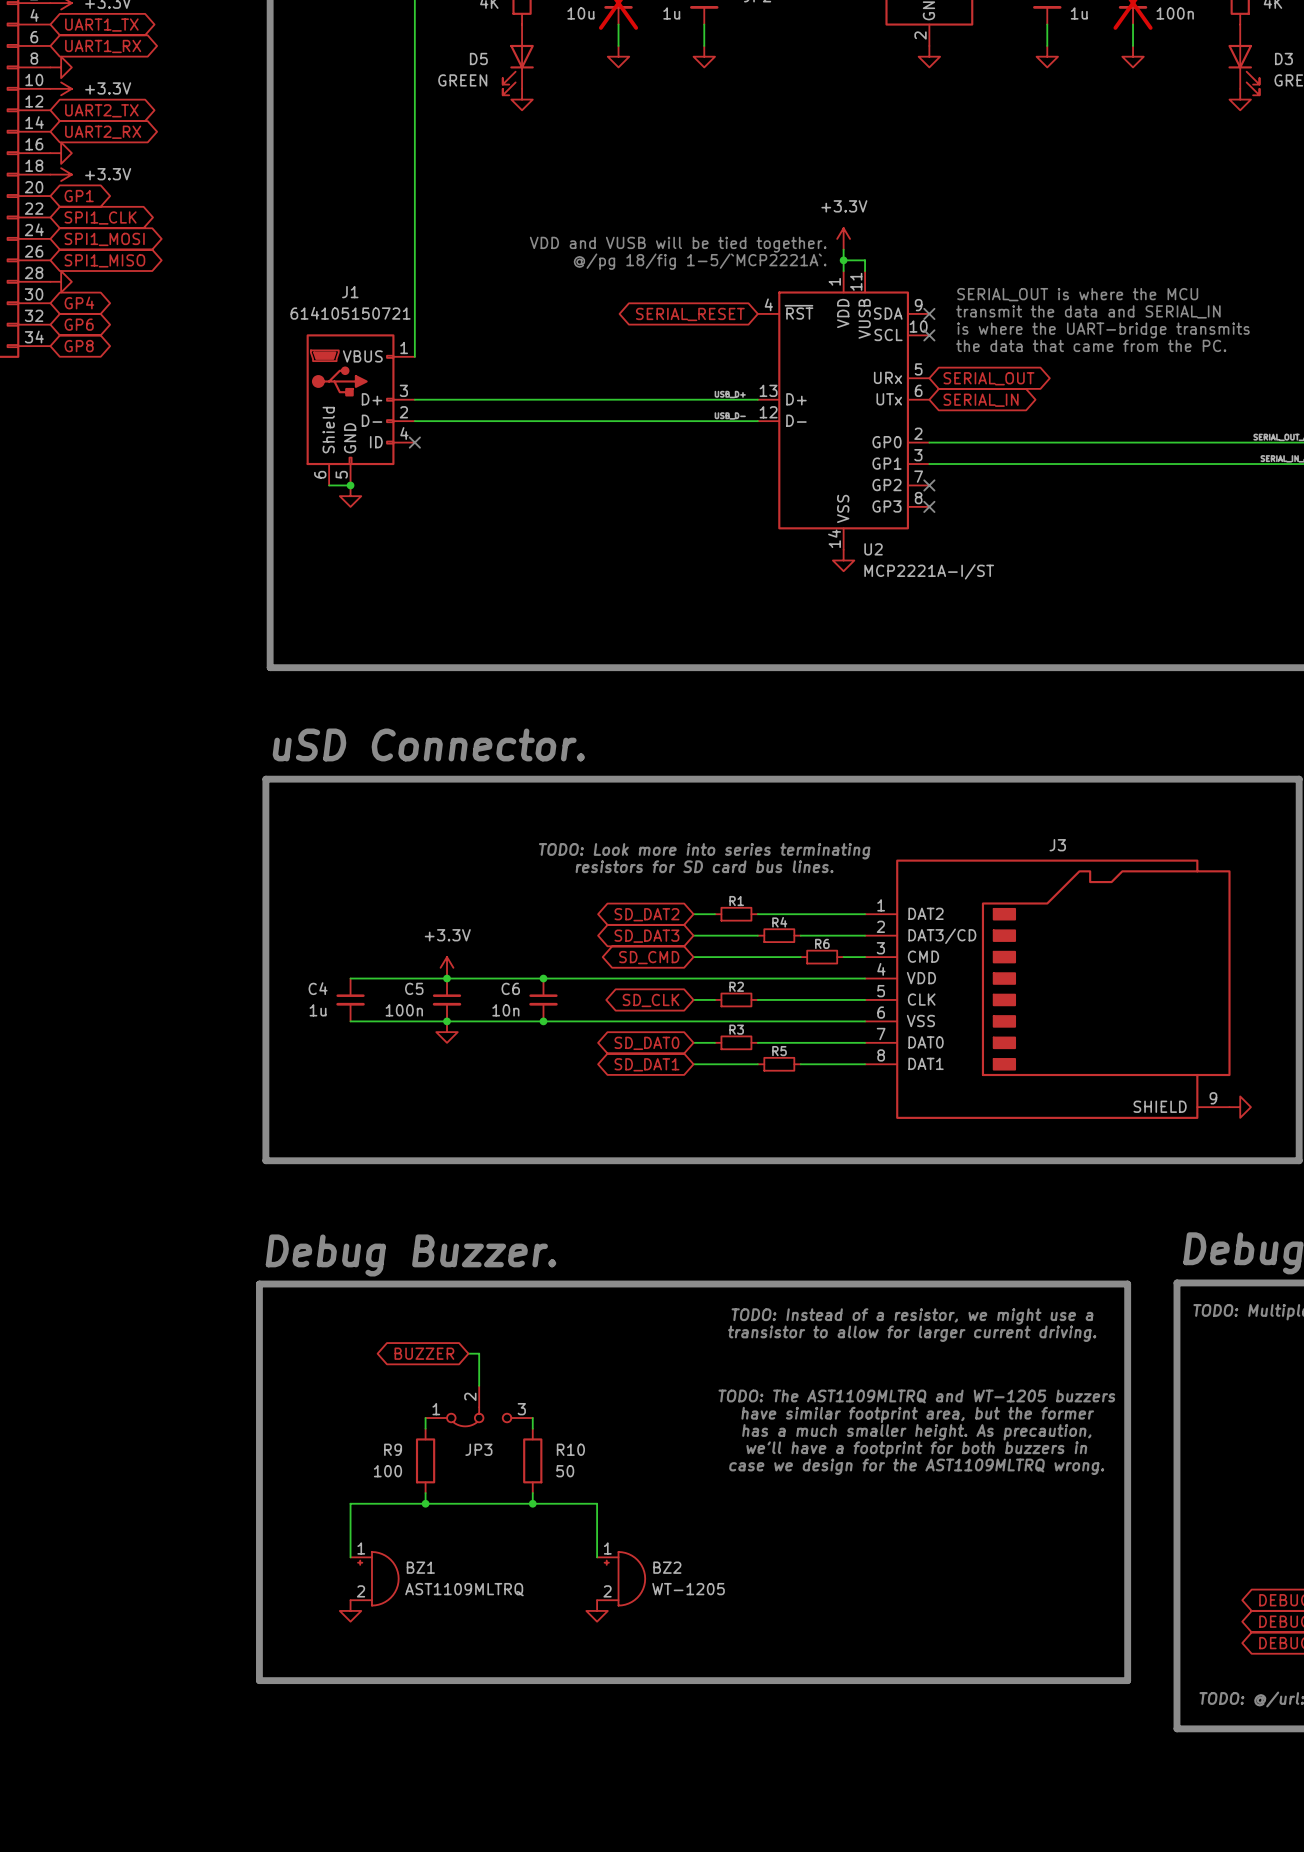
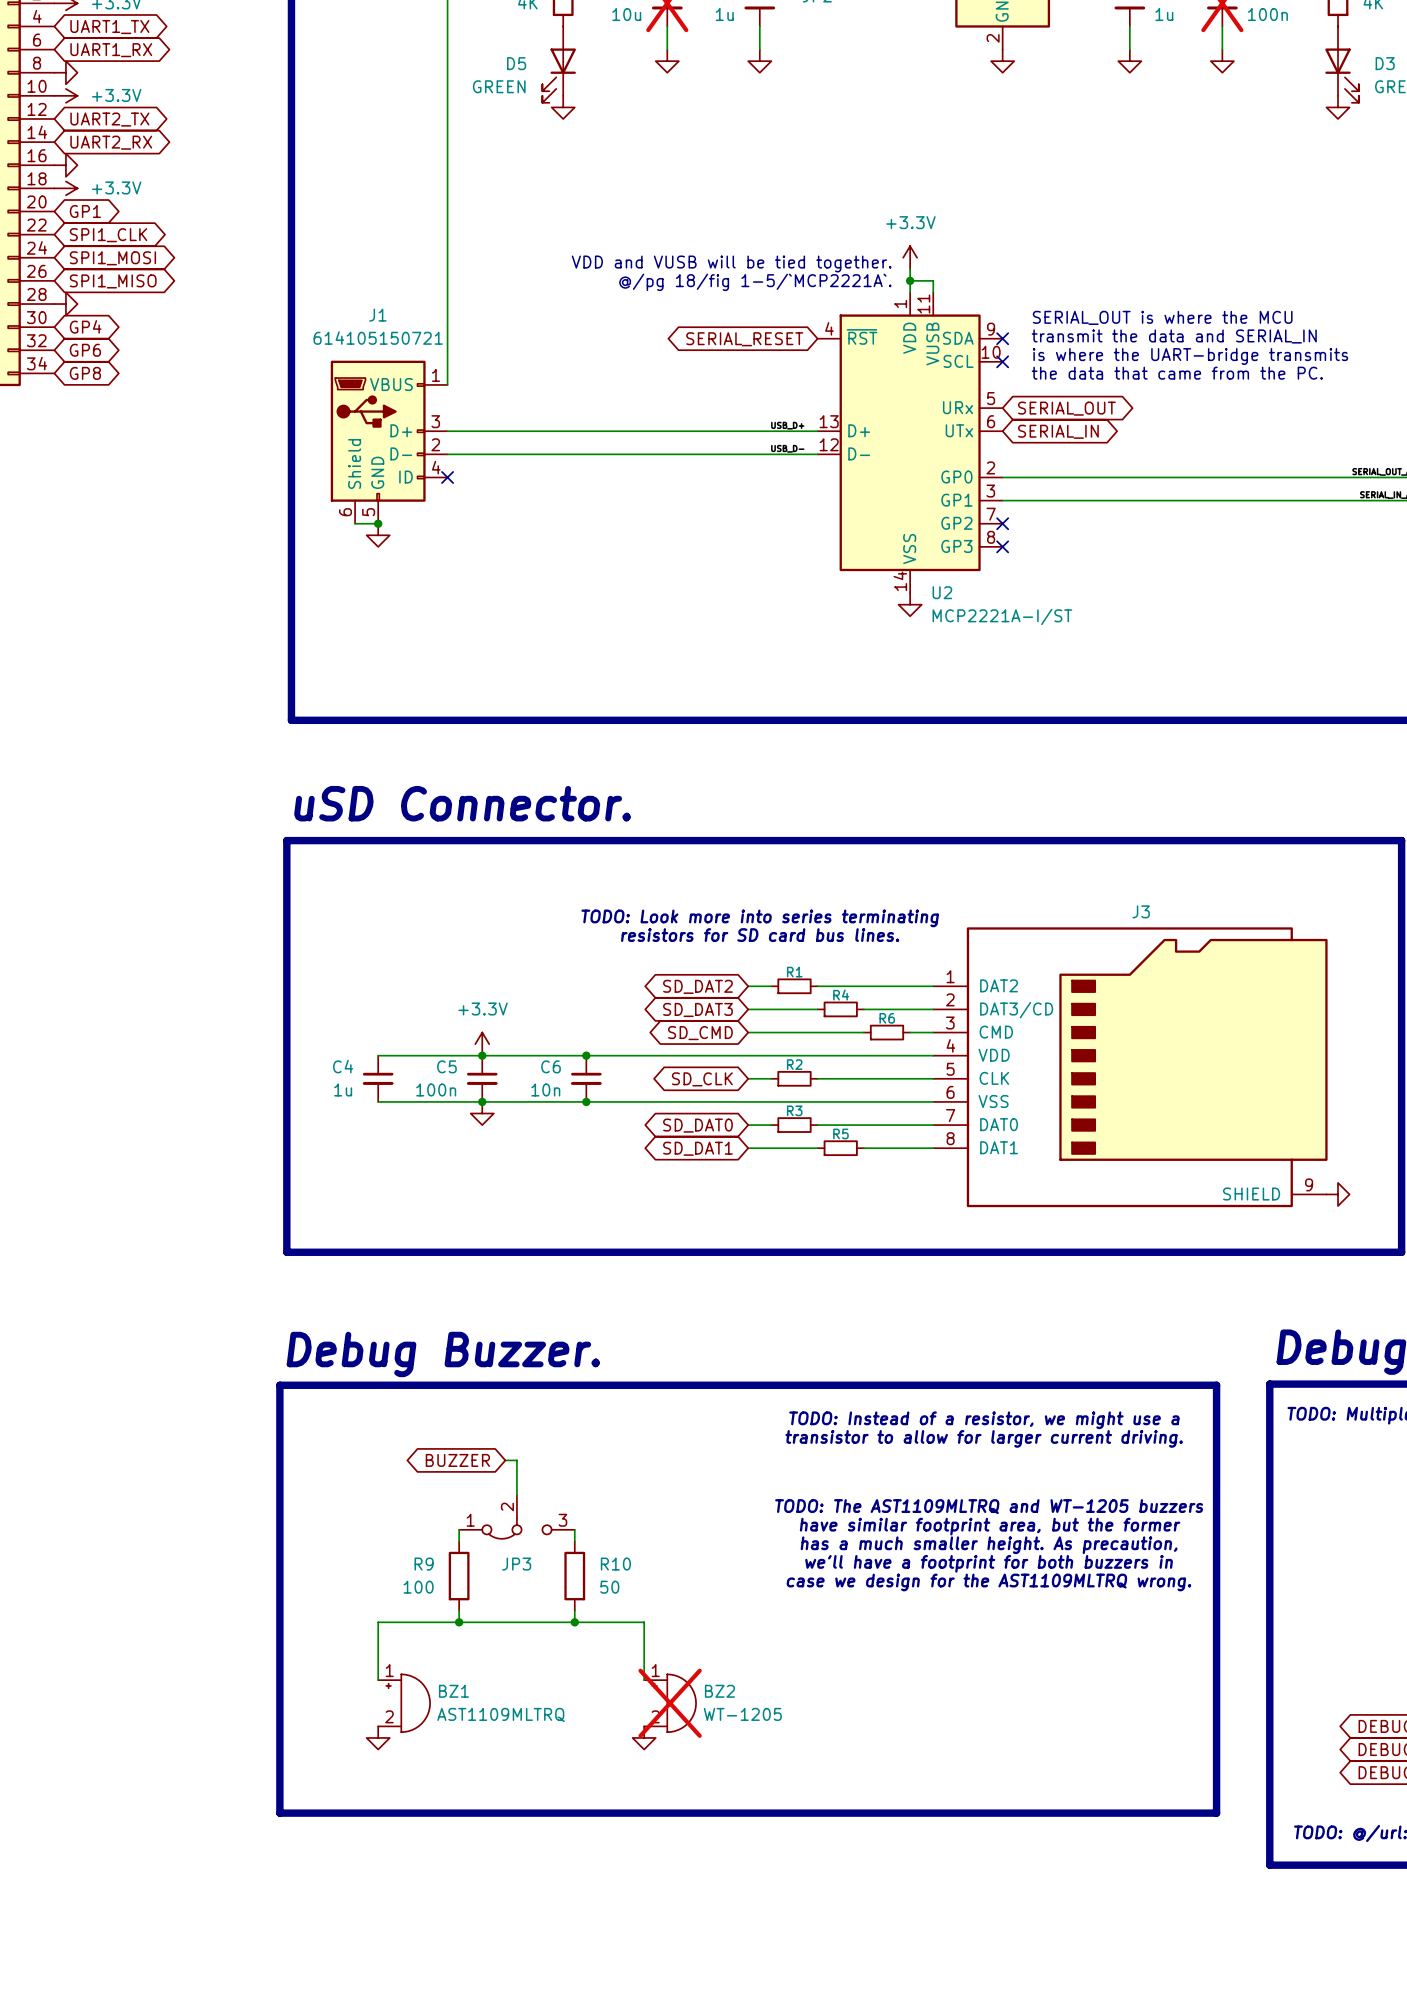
BZ2 do-not-place cross: none -> (670, 1703)

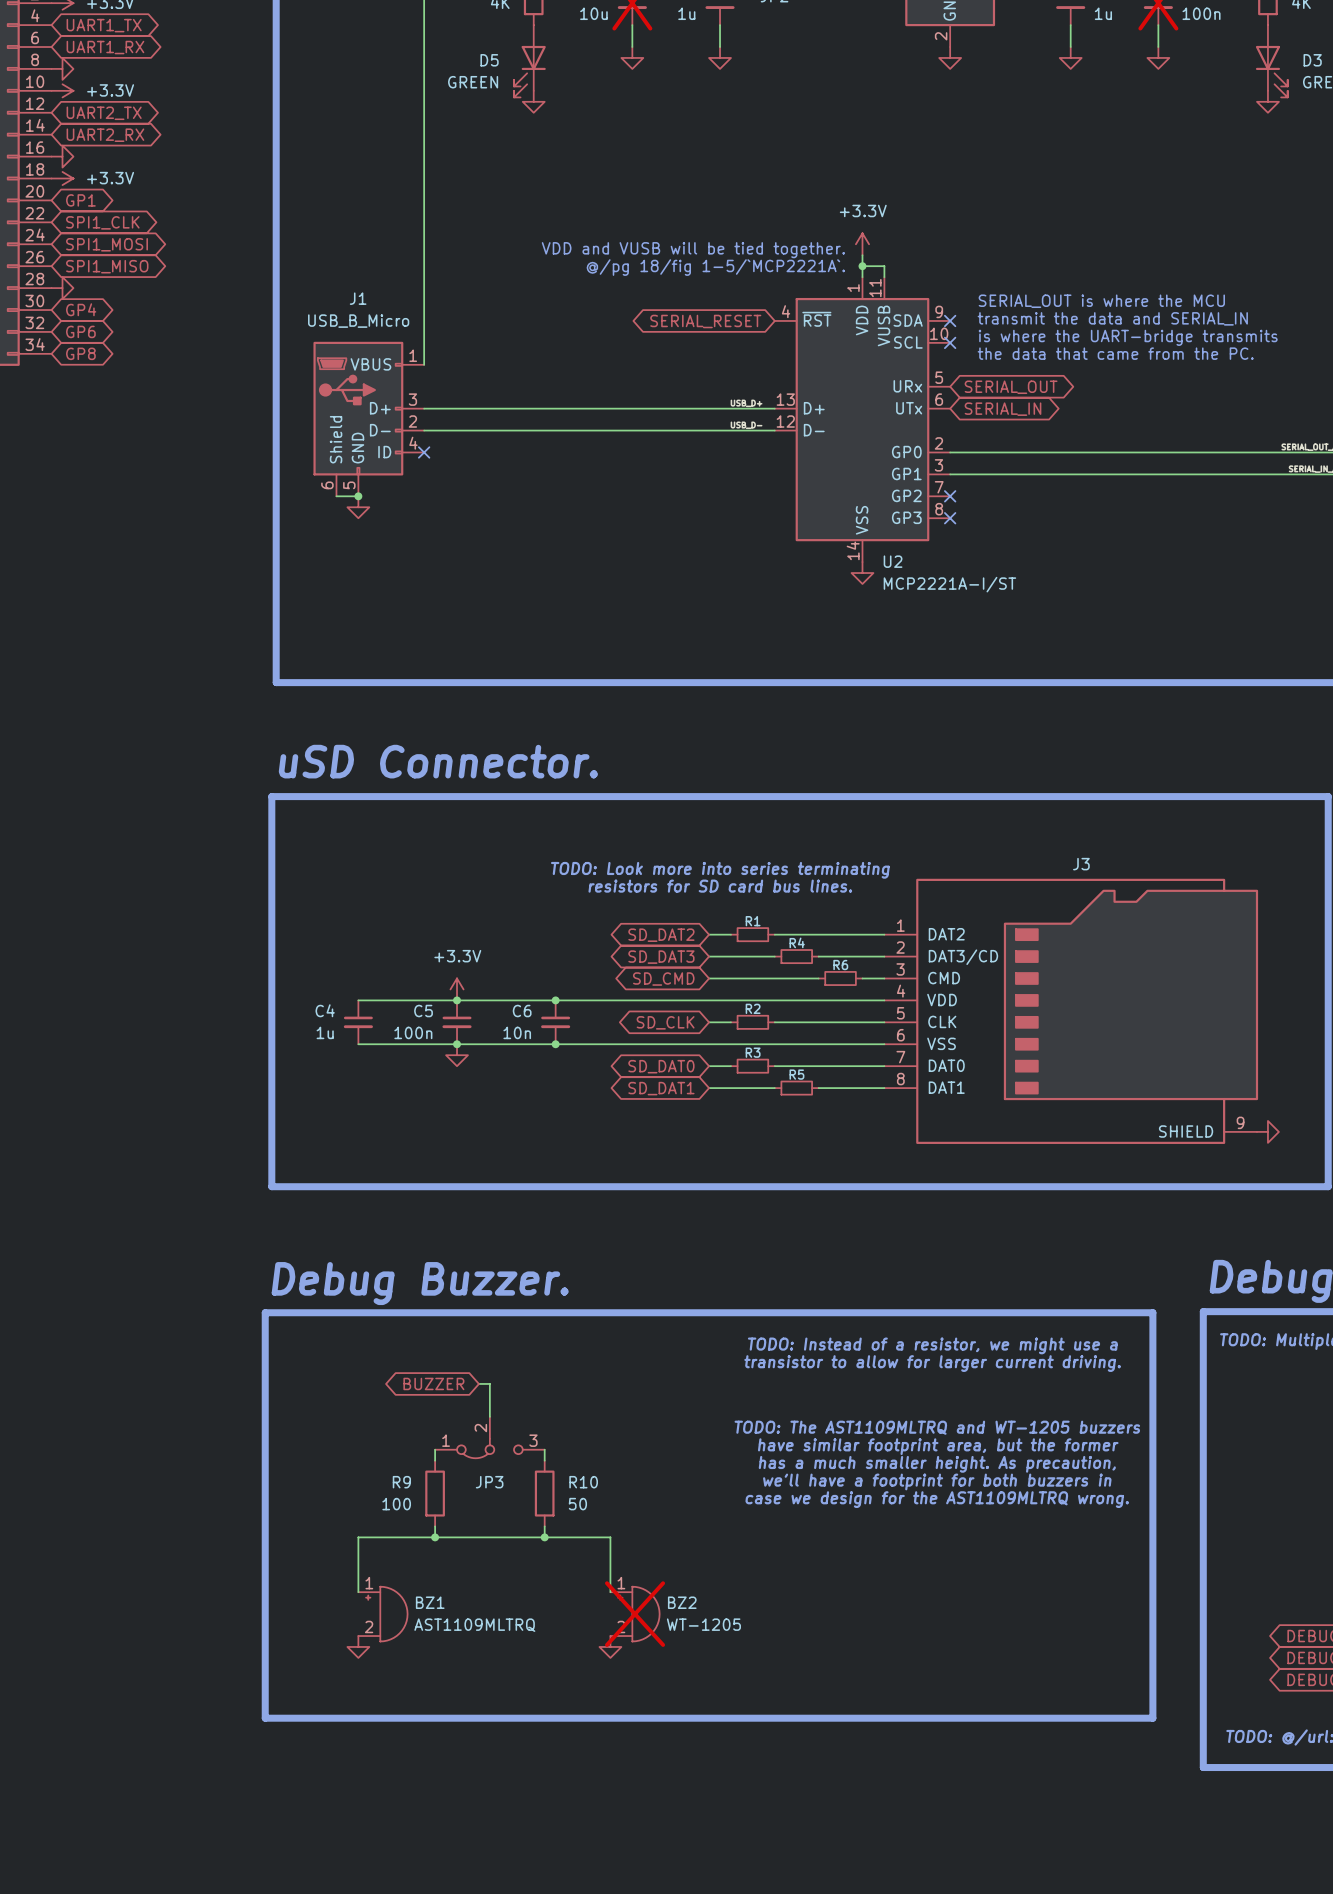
J1 value: 614105150721 (378, 338) -> USB_B_Micro (358, 321)

